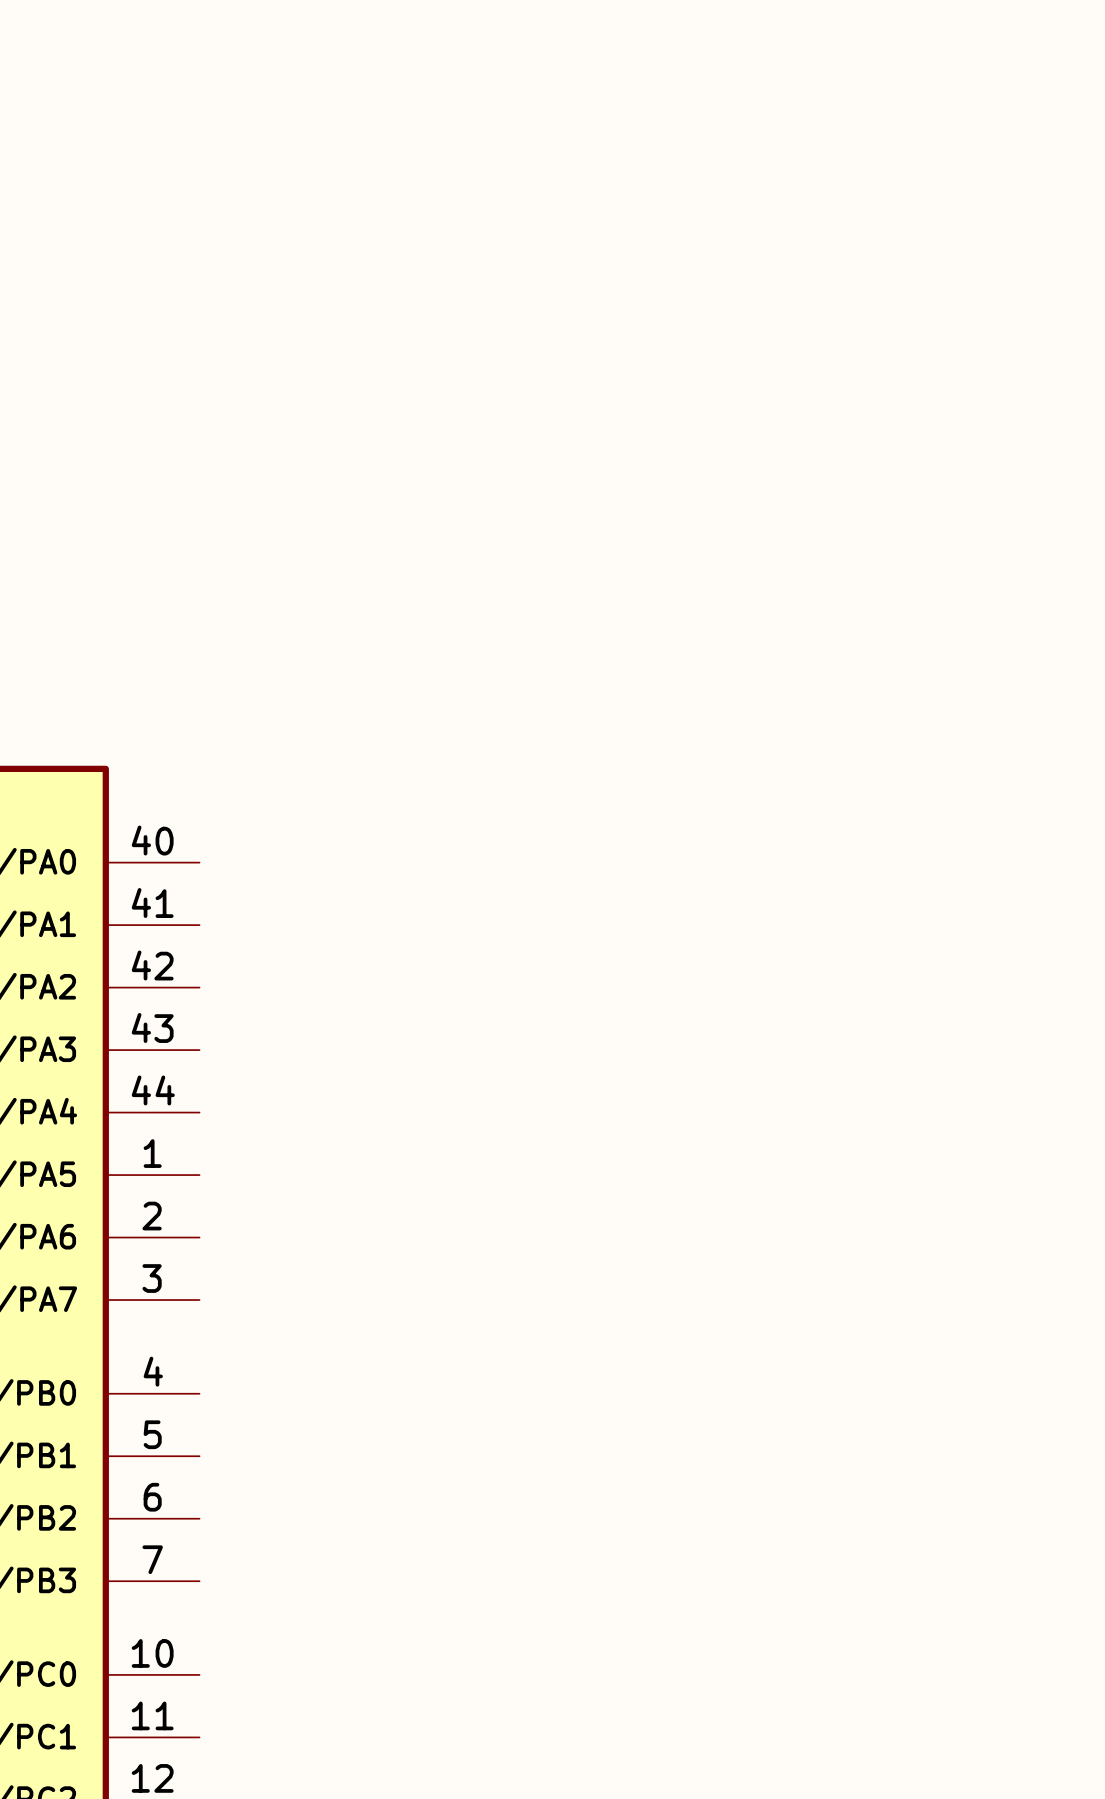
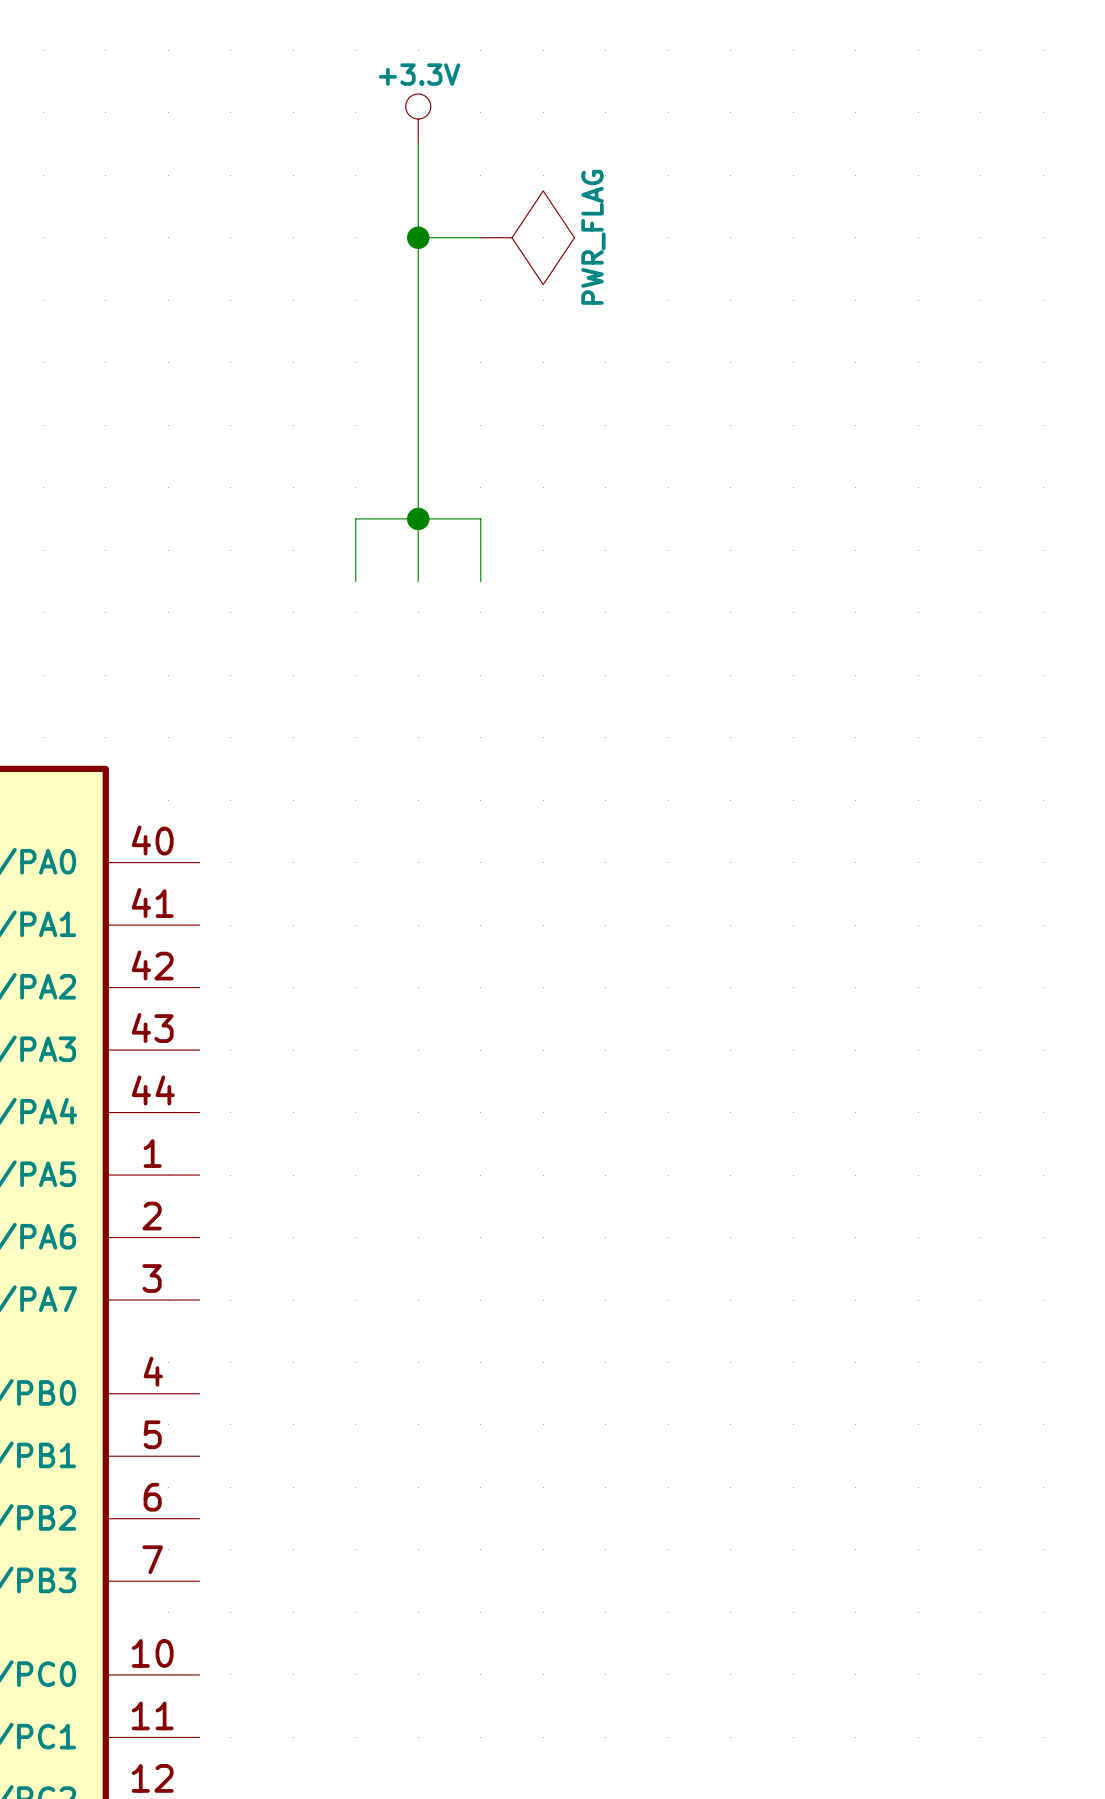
power symbol: none -> +3.3V (418, 119)
wire: none -> (418, 144) (418, 581)
wire: none -> (418, 237) (480, 237)
junction: none -> (418, 237)
power symbol: none -> PWR_FLAG (527, 237)
junction: none -> (418, 518)
wire: none -> (355, 581) (355, 518) (480, 518) (480, 581)

